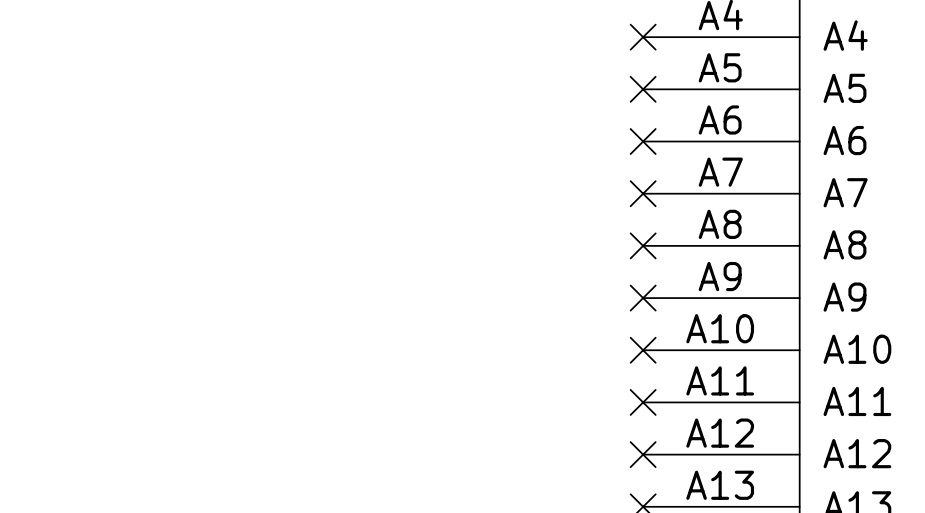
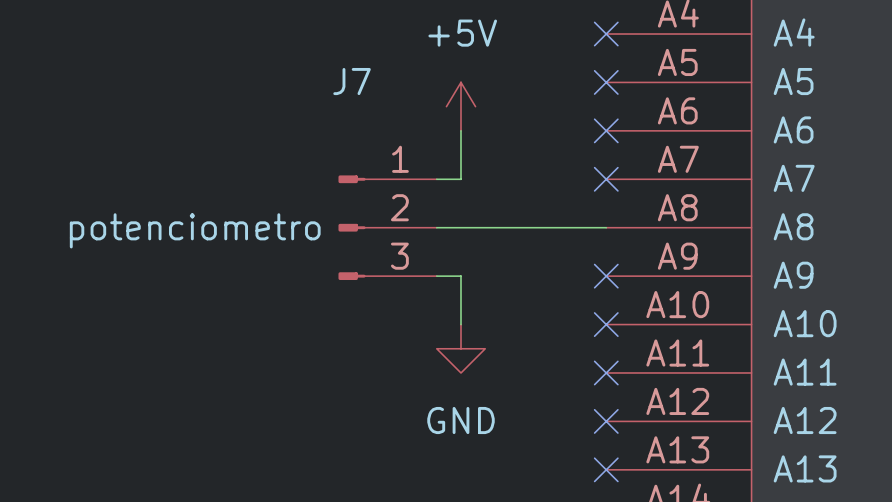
power symbol: none -> +5V (460, 106)
wire: none -> (460, 130) (460, 179) (436, 179)
J7: none -> potenciometro (387, 227)
wire: none -> (436, 227) (606, 227)
no-connect mark: (643, 245) -> none
wire: none -> (436, 276) (460, 276) (460, 324)
power symbol: none -> GND (460, 348)

